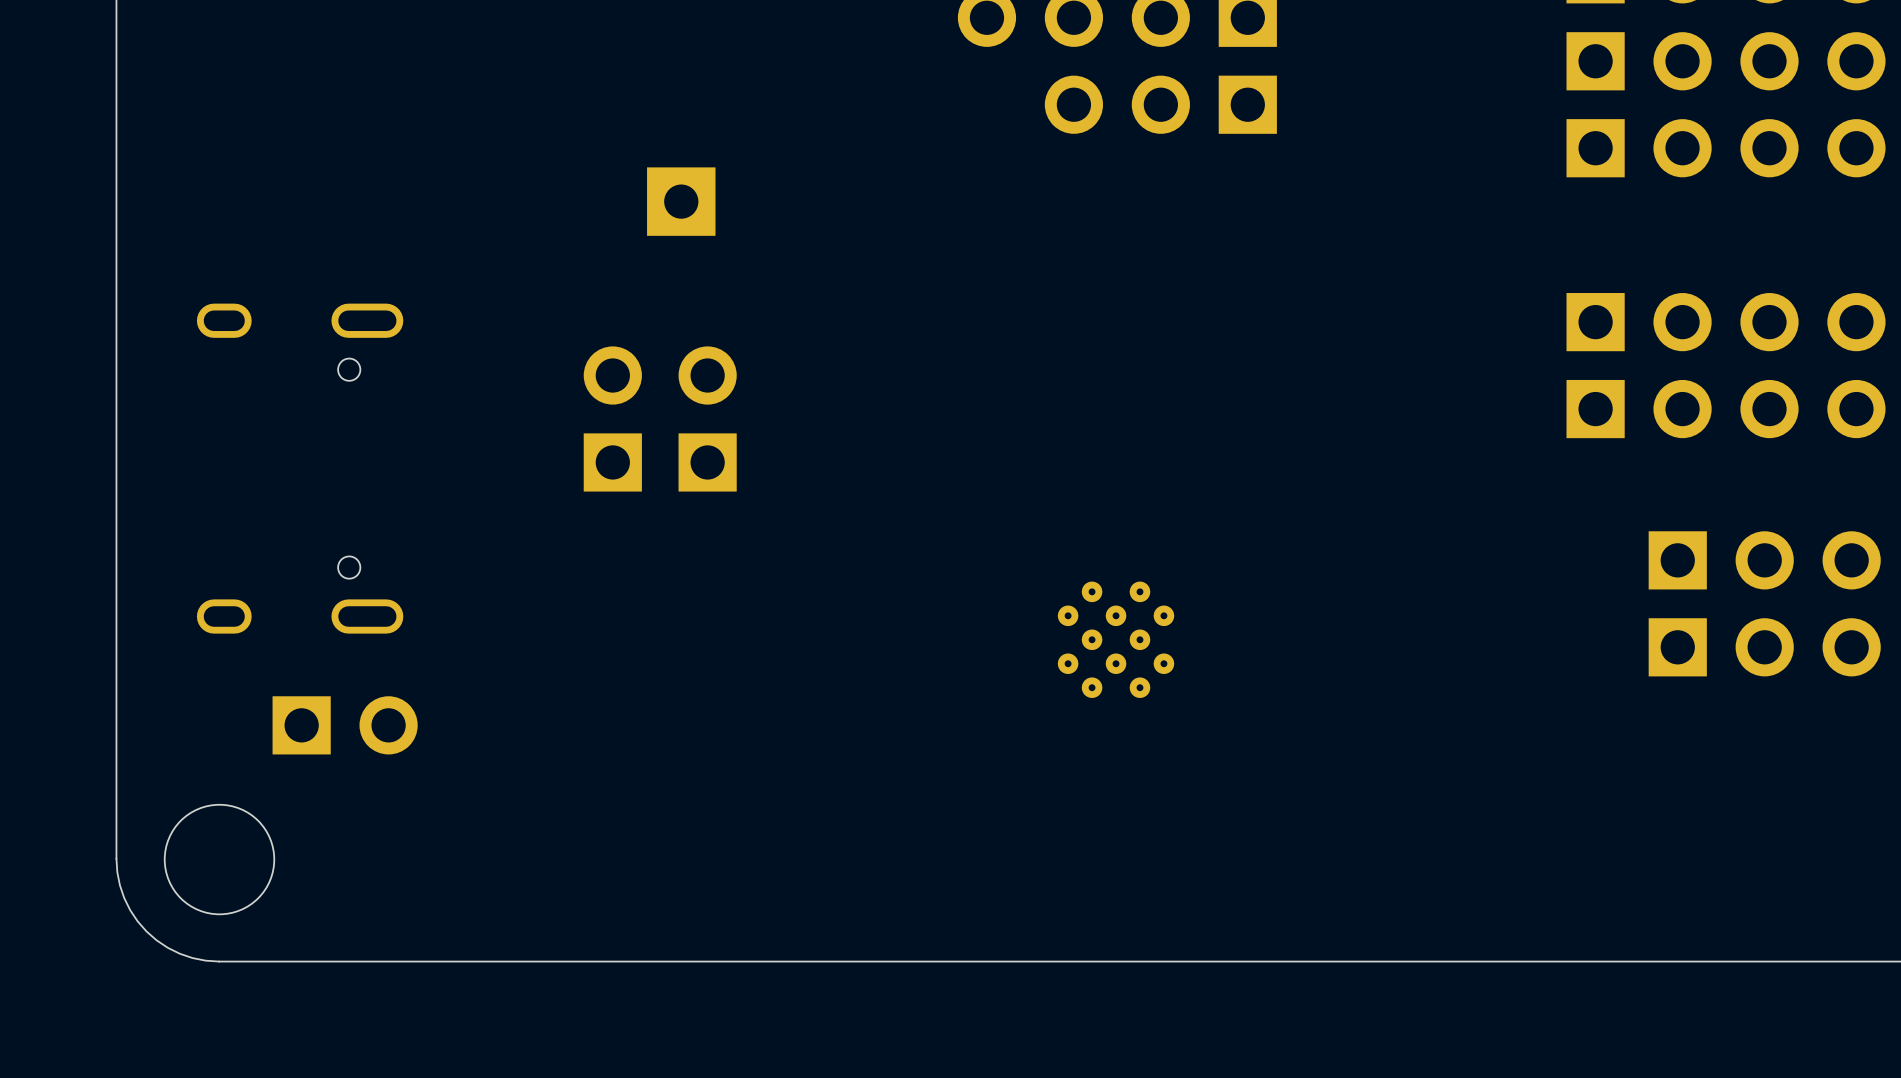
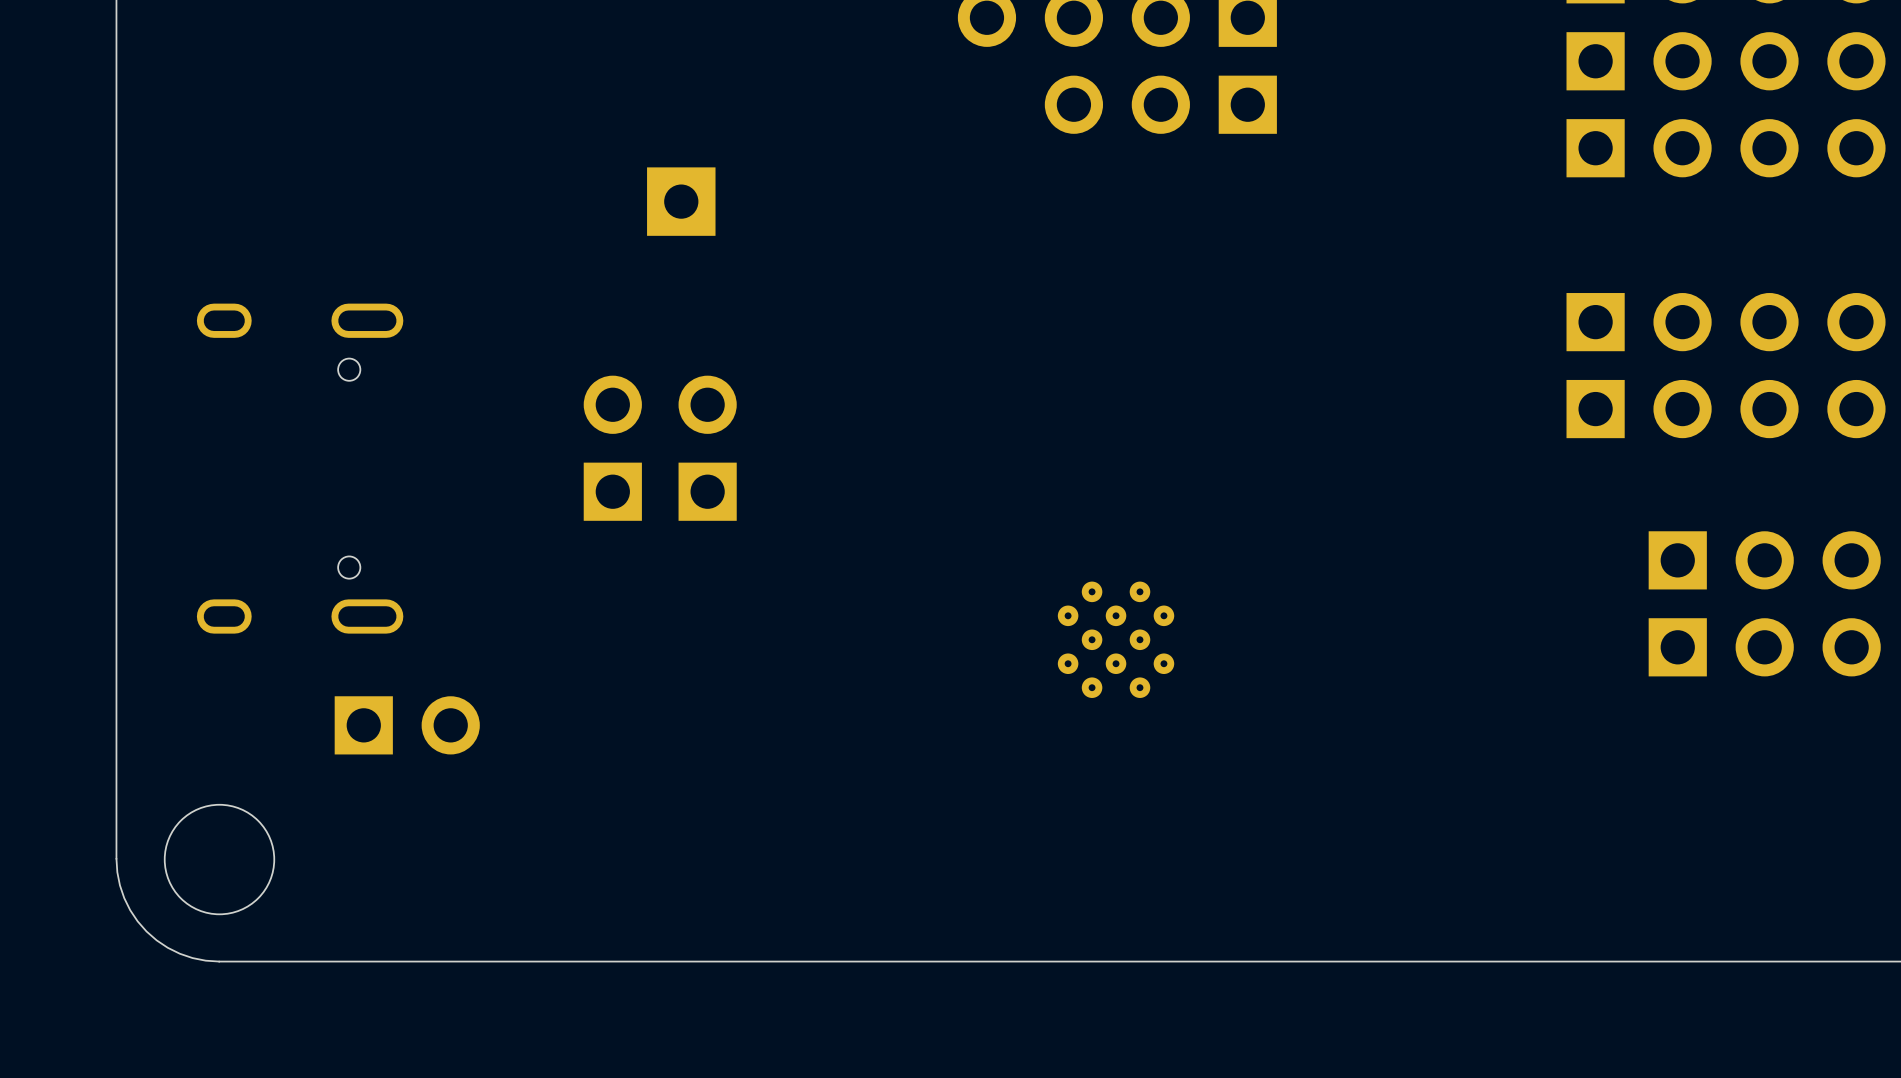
part position: (612, 418) -> (612, 448)
part position: (707, 418) -> (707, 448)
part position: (345, 725) -> (407, 725)

